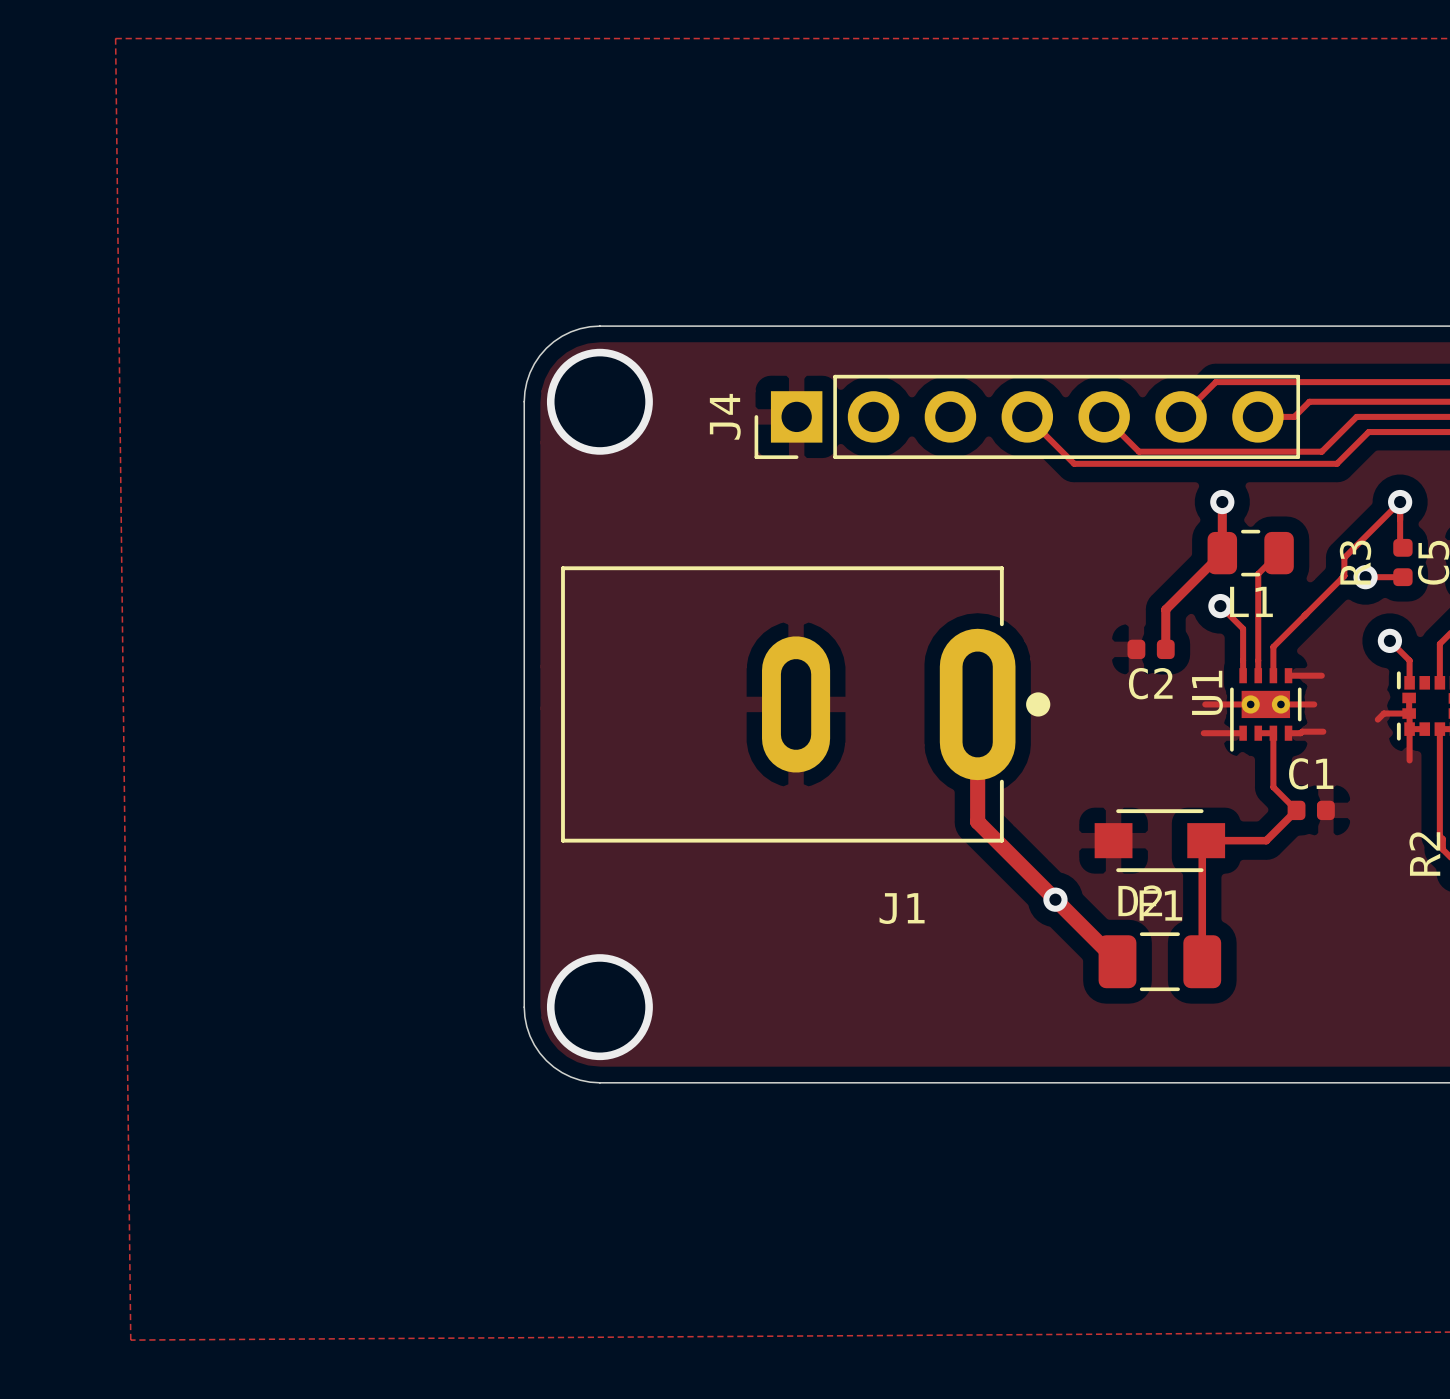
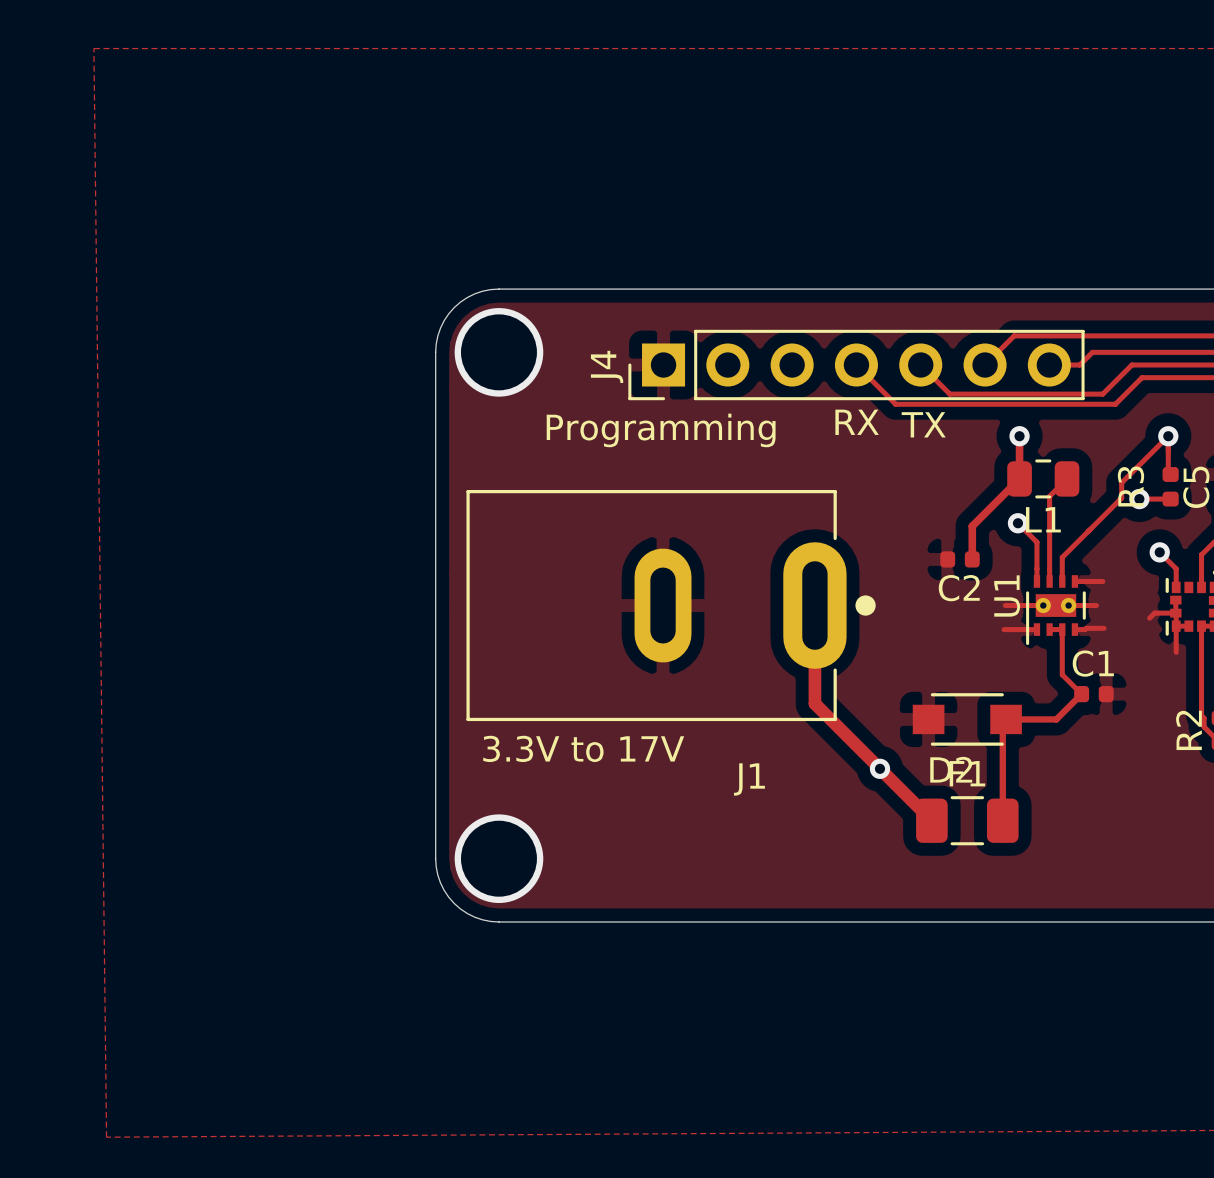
text: none -> RX (857, 422)
text: none -> TX (923, 424)
text: none -> Programming (661, 430)
text: none -> 3.3V to 17V (583, 748)

